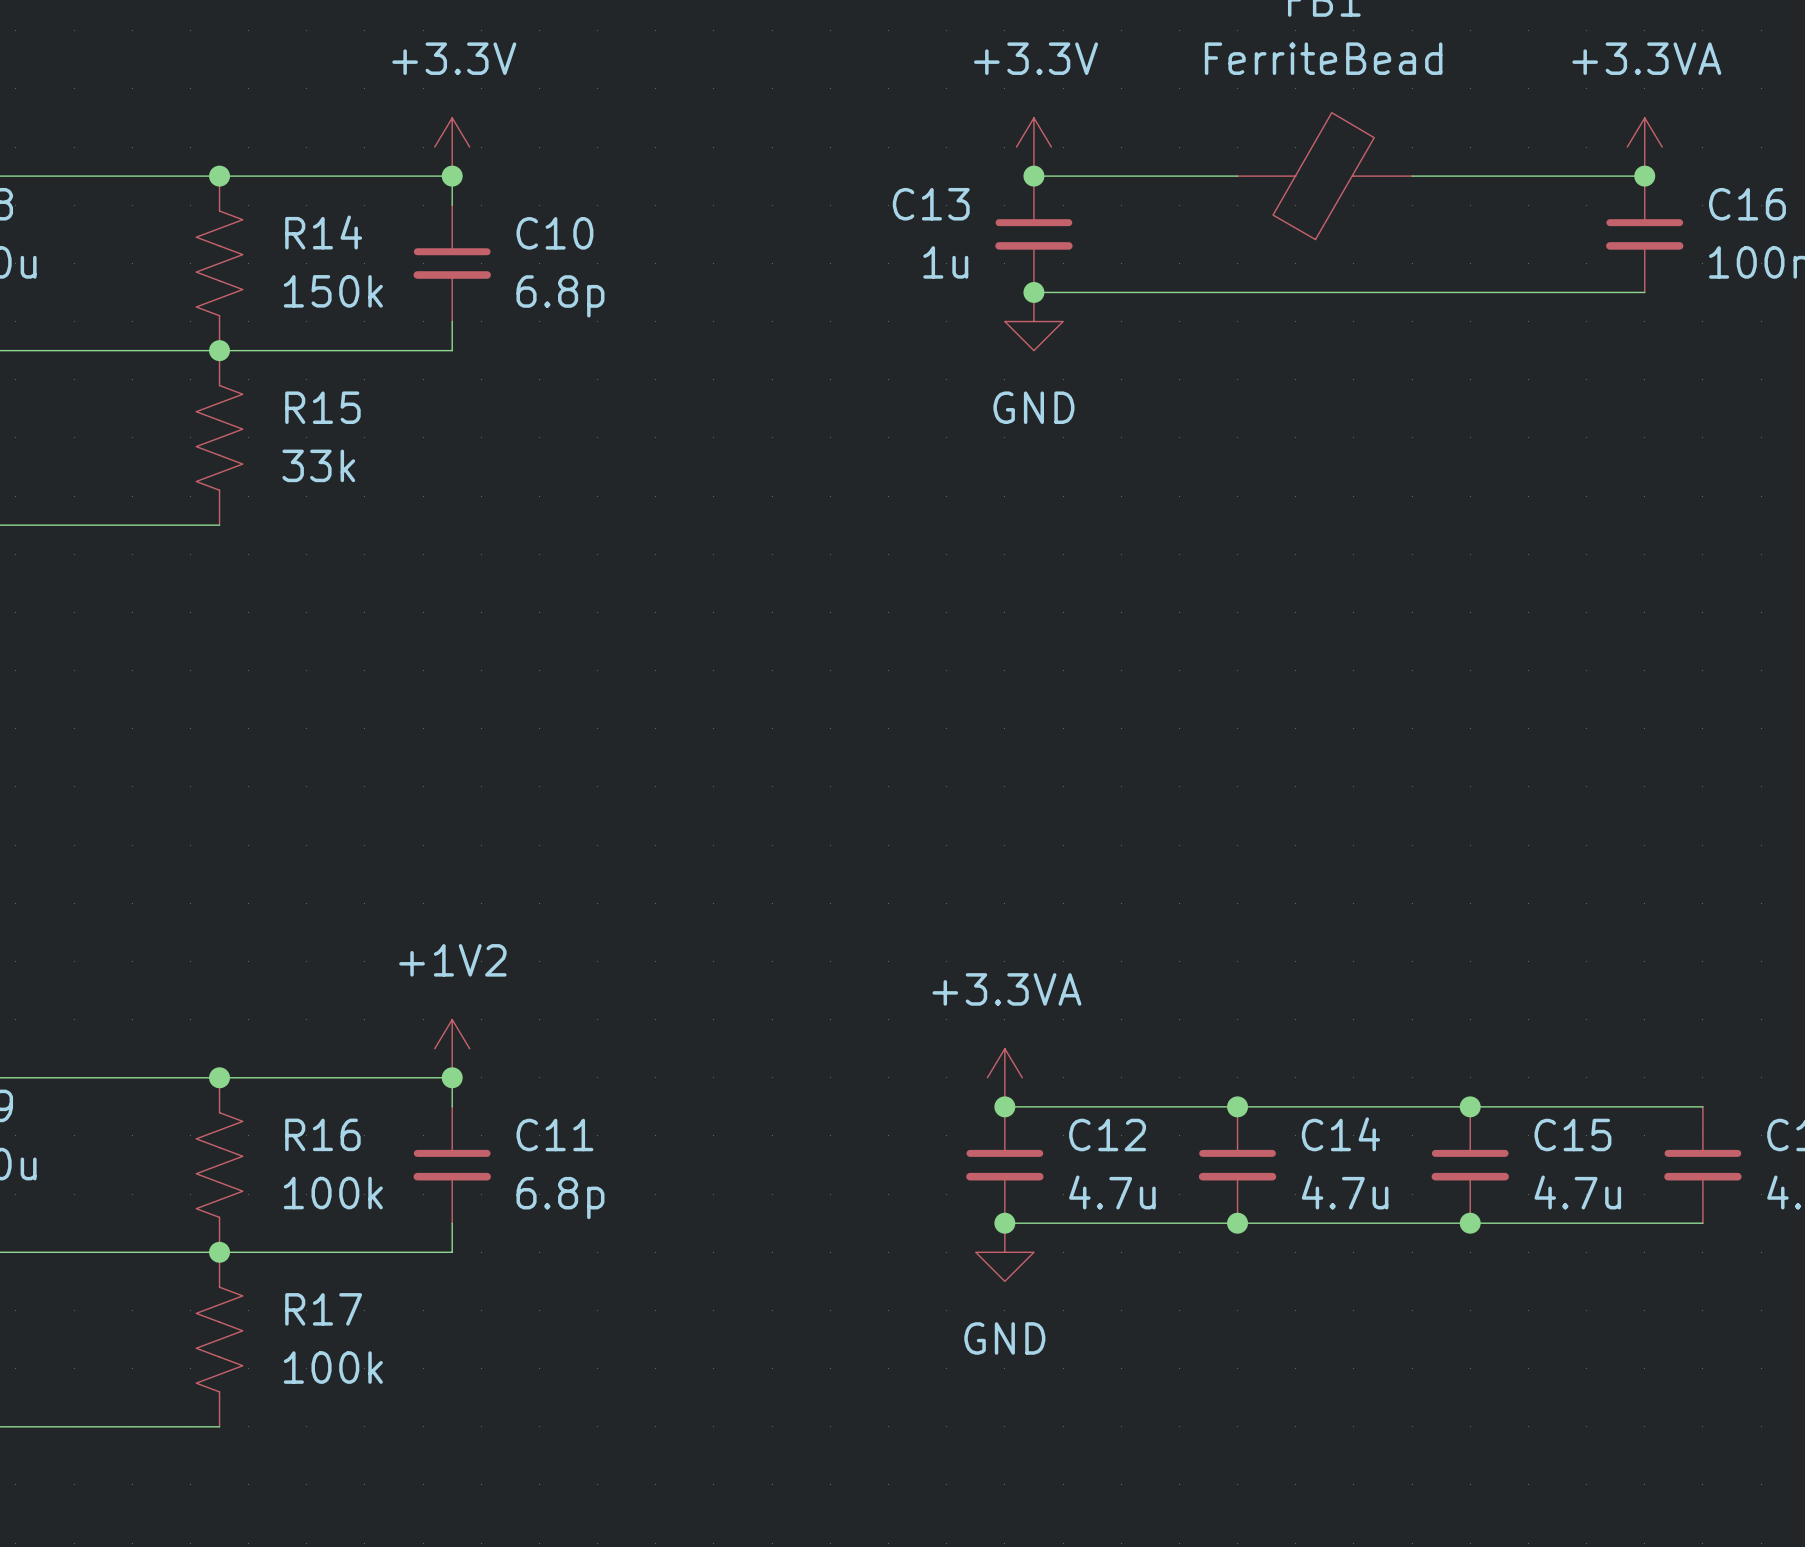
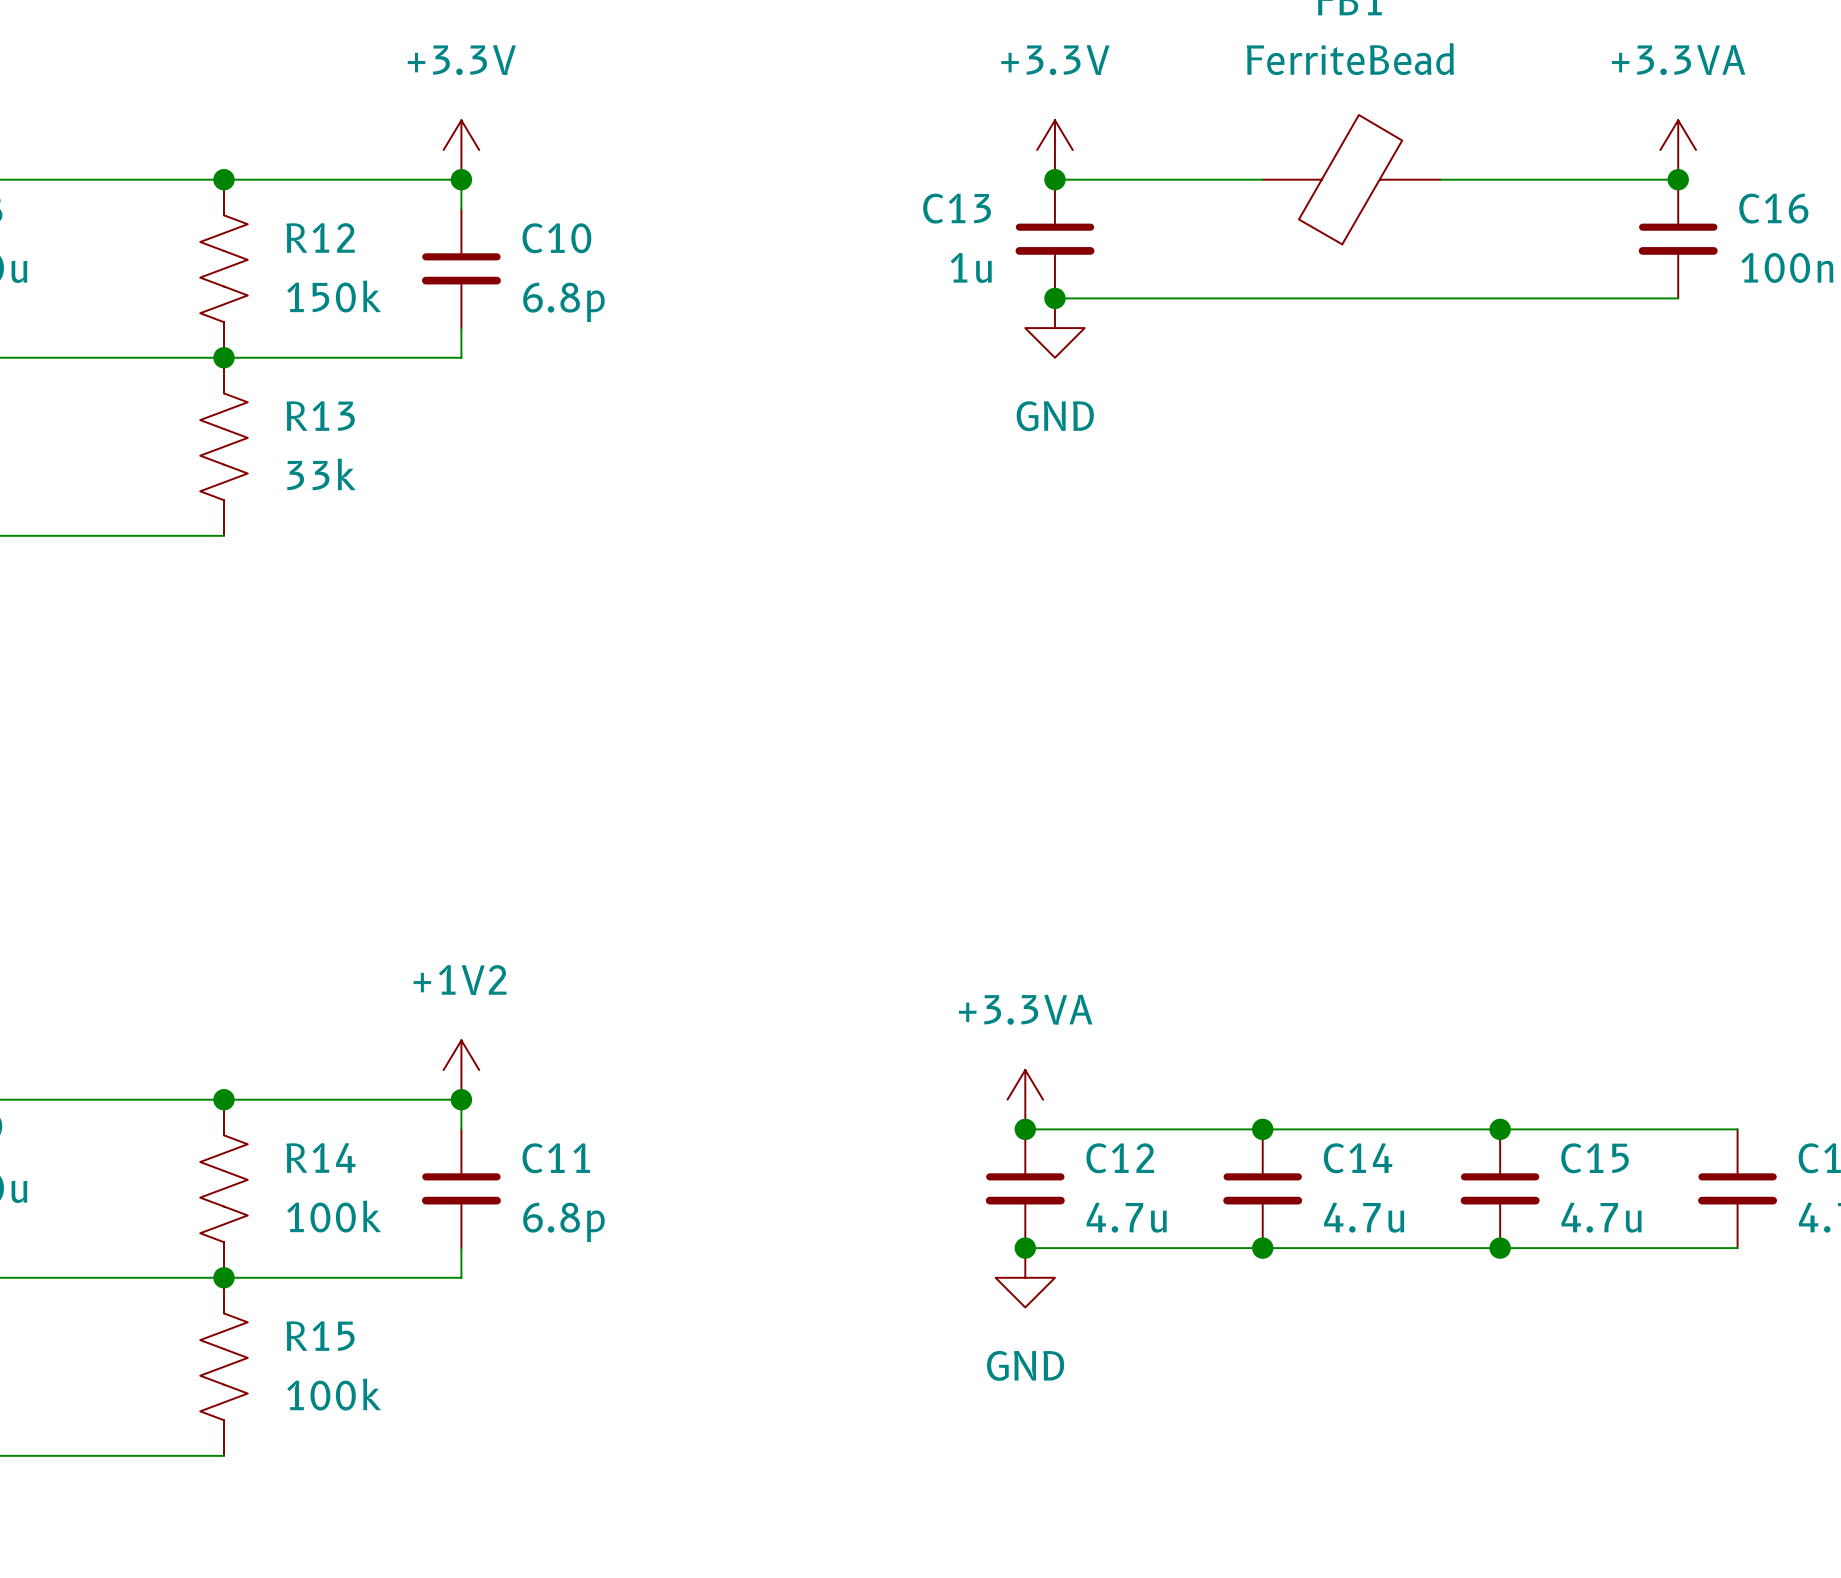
R14 name: R14 (323, 232) -> R12 (320, 237)
R15 name: R15 (322, 407) -> R13 (320, 416)
R16 name: R16 (322, 1134) -> R14 (320, 1157)
R17 name: R17 (323, 1309) -> R15 (320, 1336)

